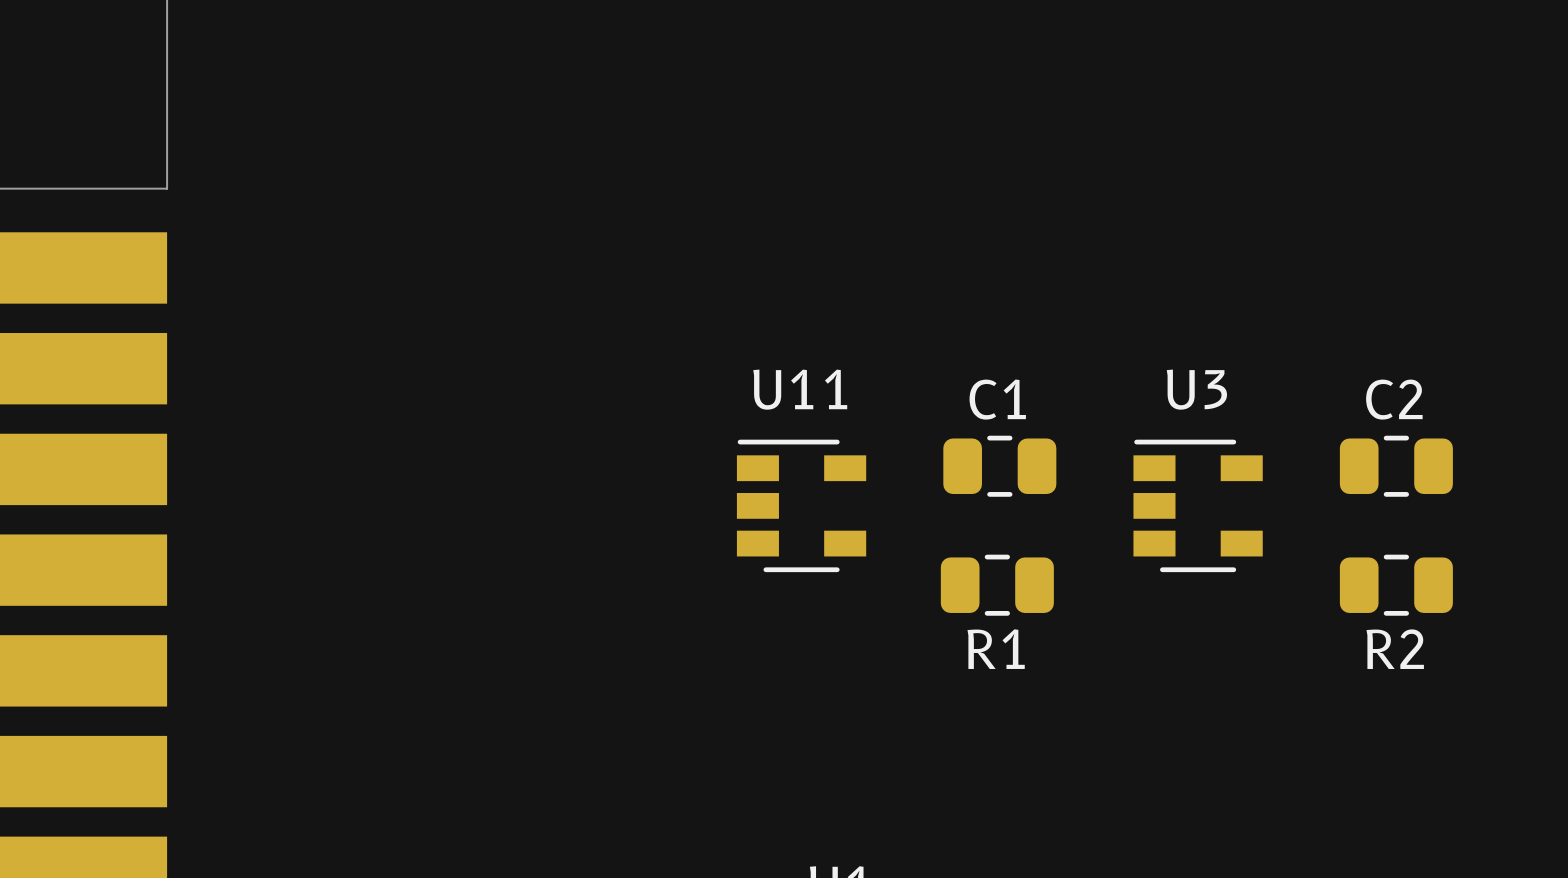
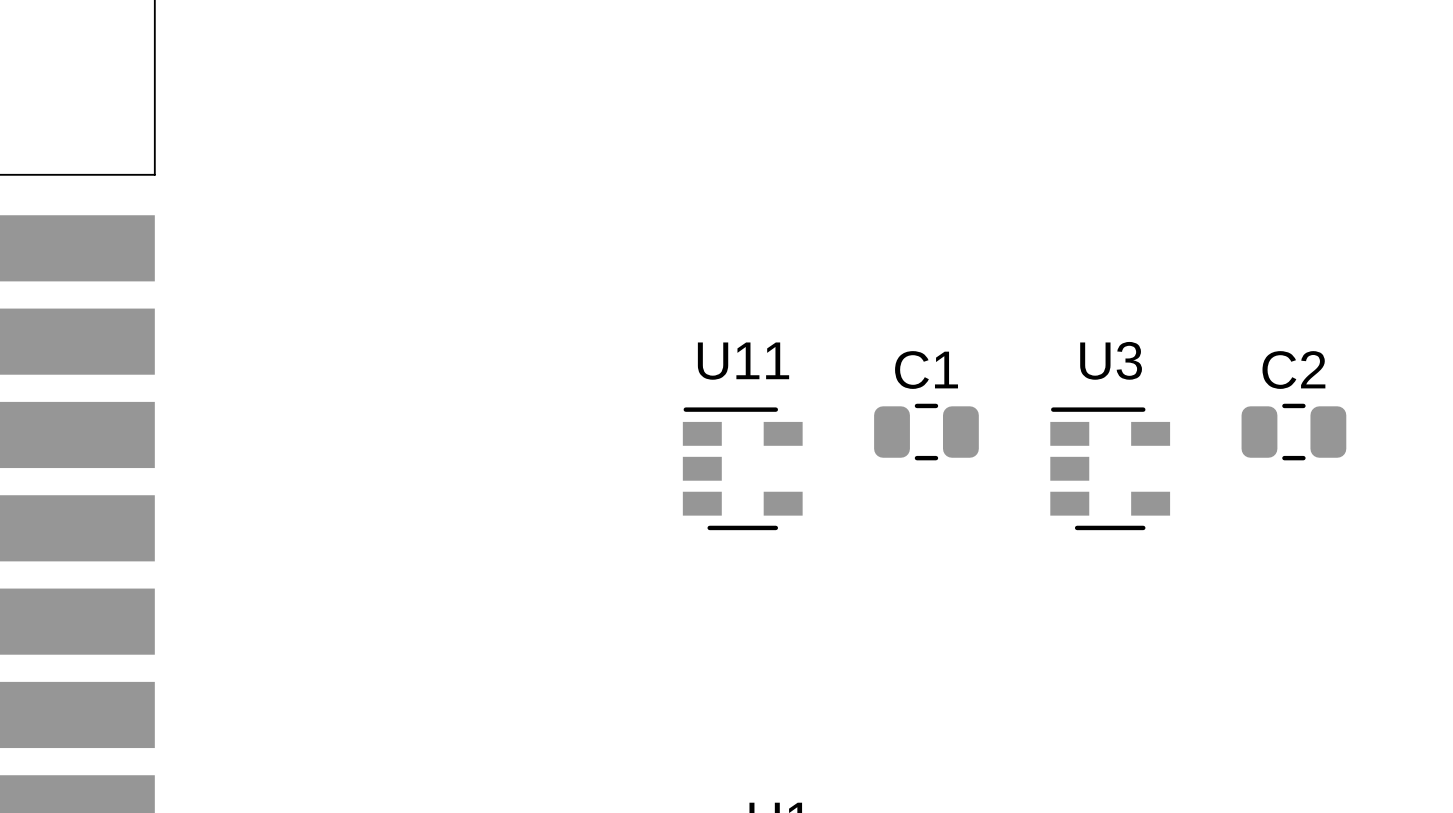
R1: (997, 585) -> none
R2: (1396, 585) -> none

